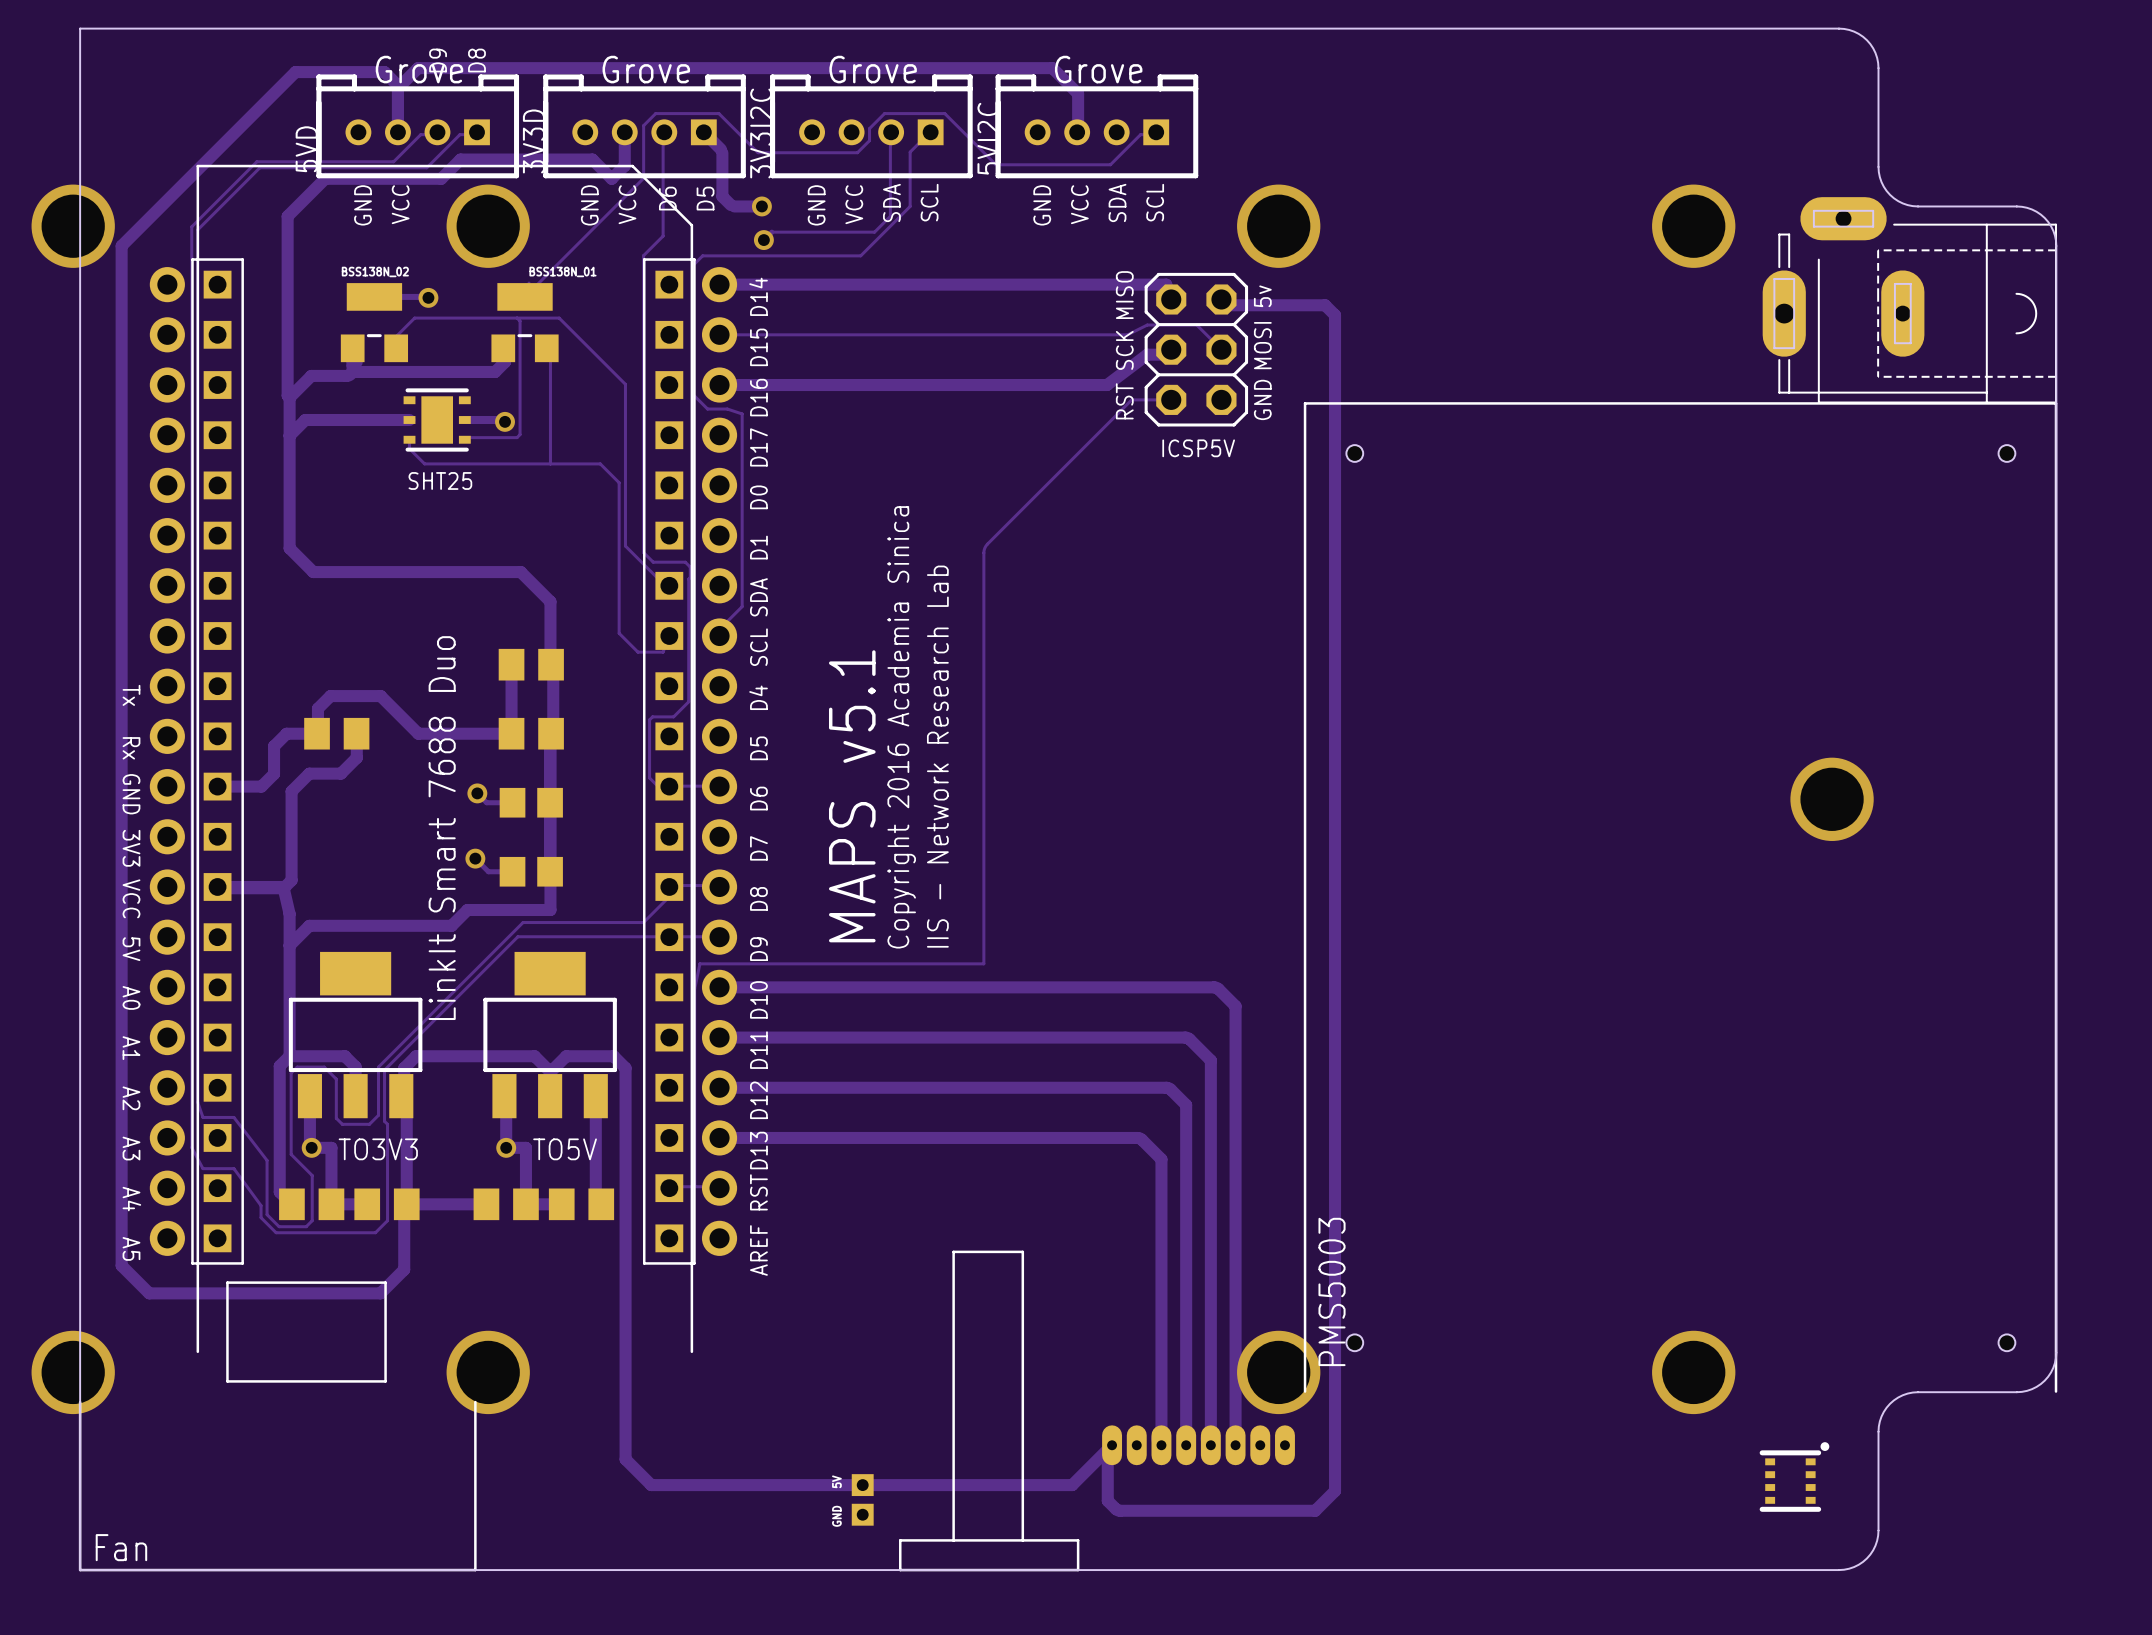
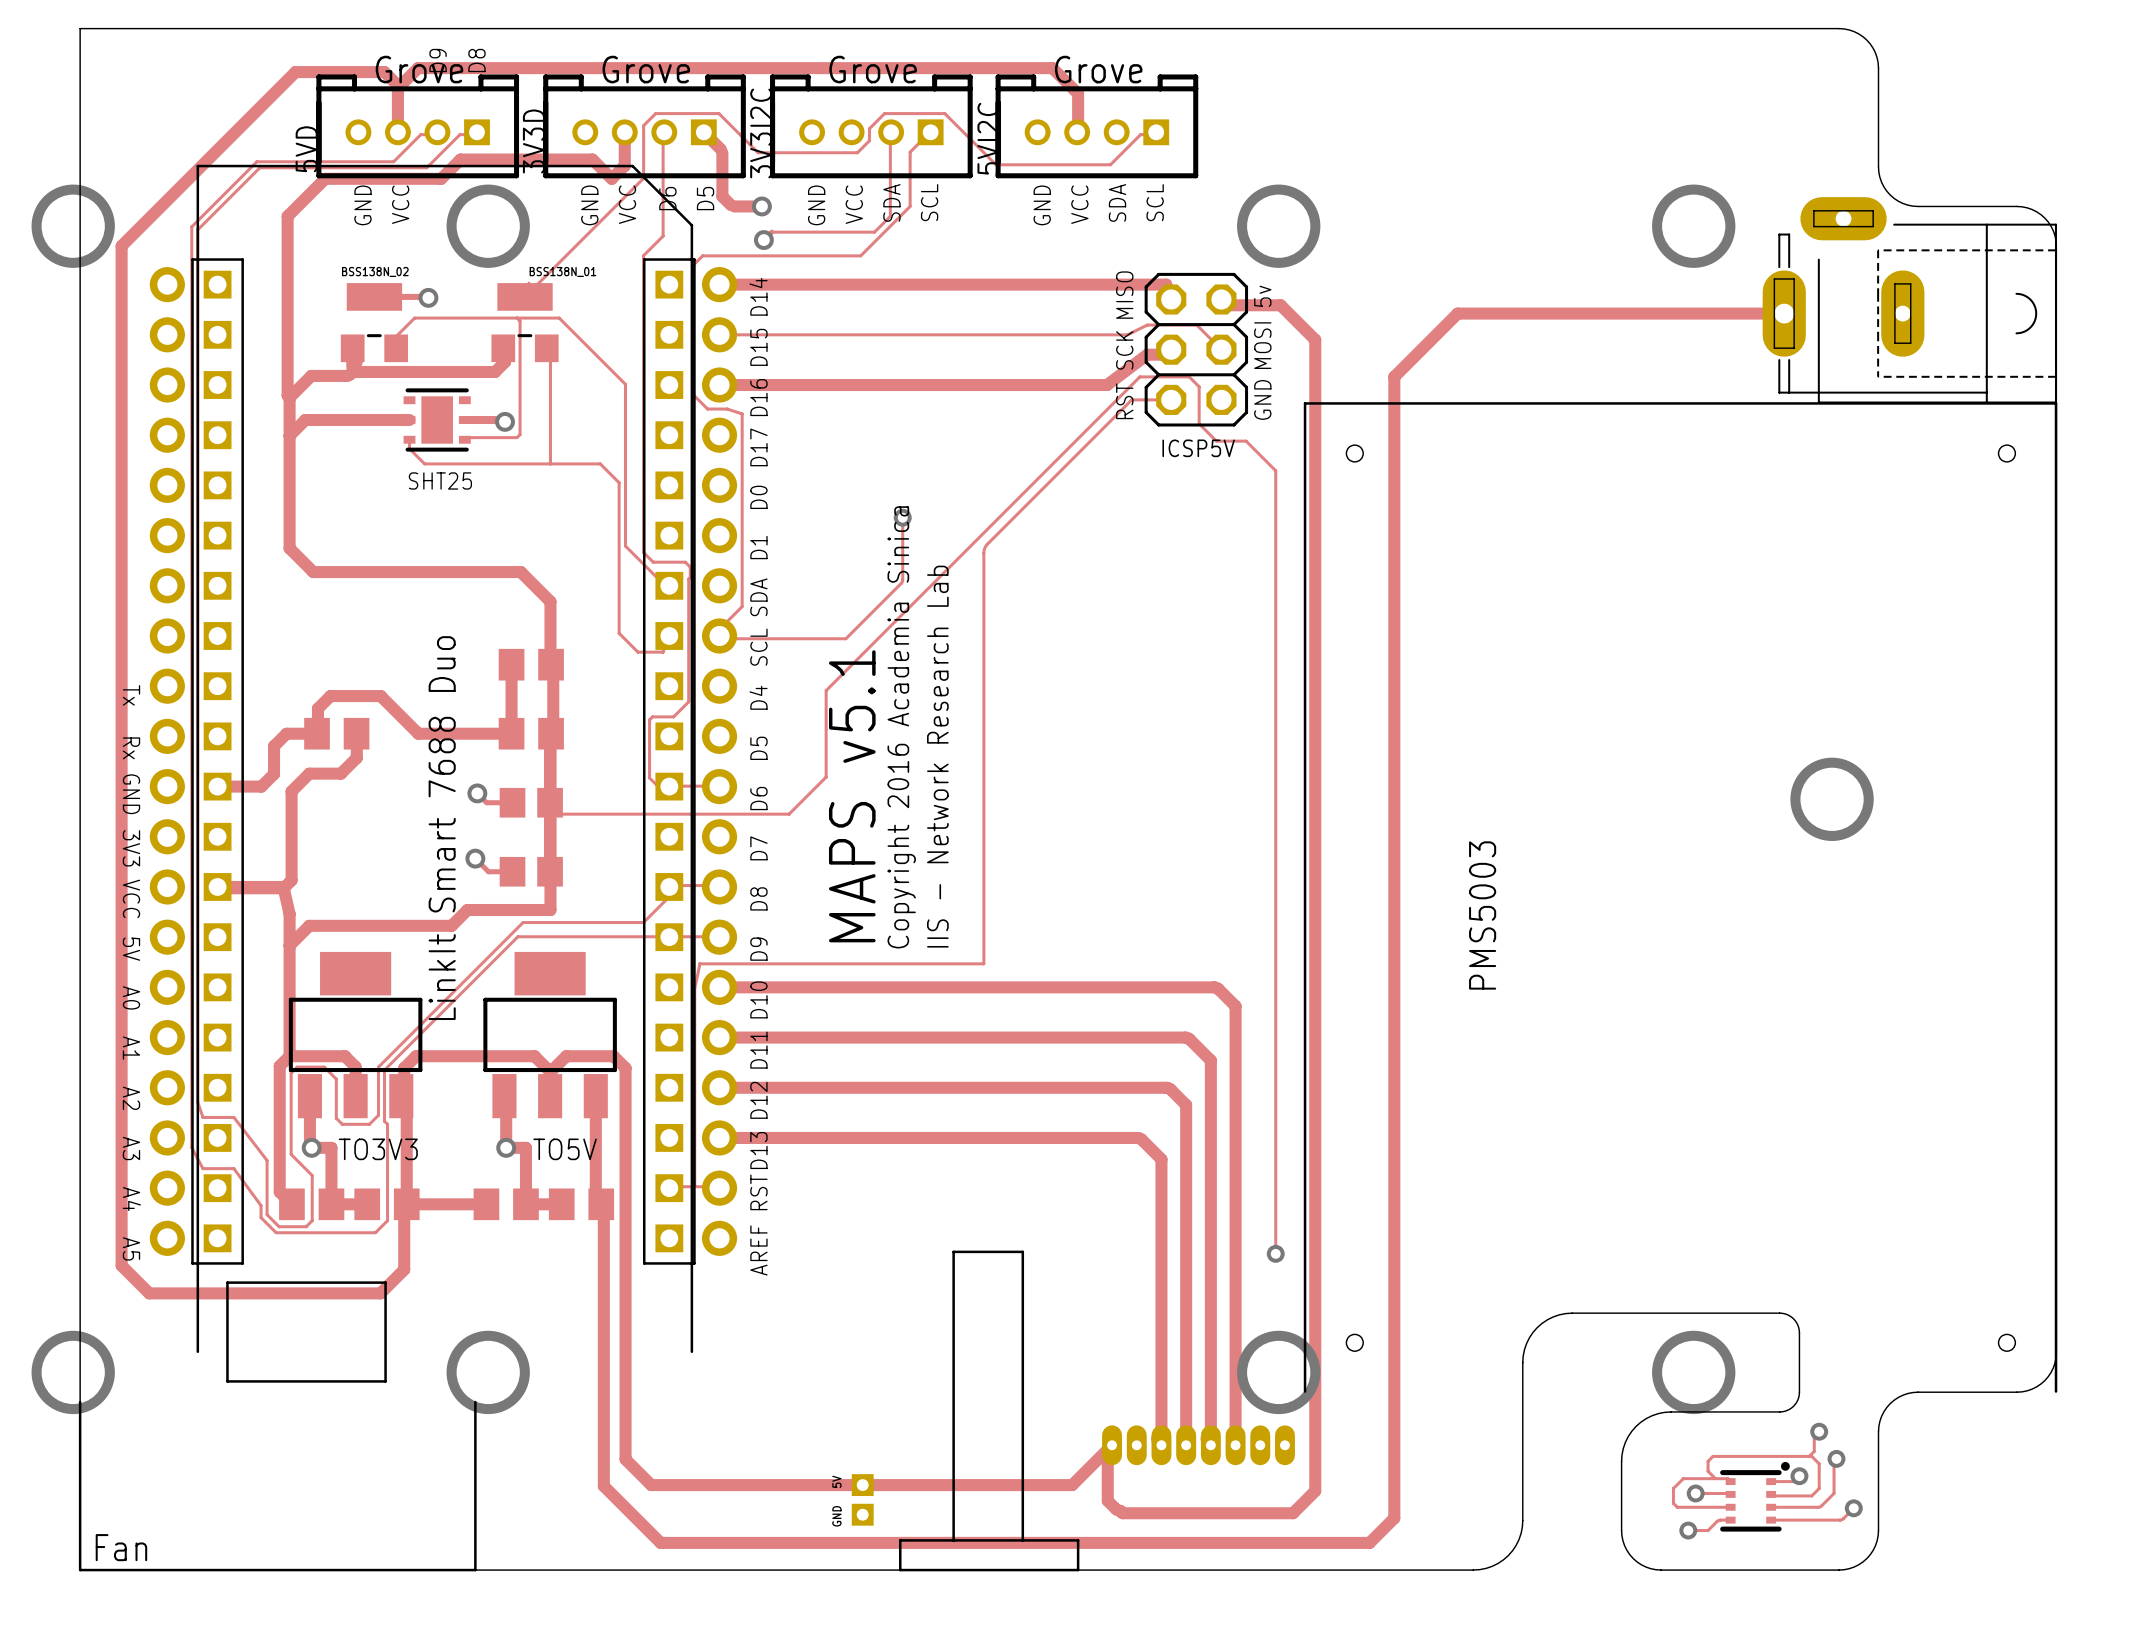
track: (1280, 305) (1325, 305) (1335, 315) (1335, 1491) (1315, 1510) (1120, 1510) -> (1280, 305) (1315, 339) (1315, 1491) (1293, 1513) (1122, 1513) (1120, 1510)
track: none -> (1784, 313) (1457, 313) (1394, 376) (1394, 1518) (1369, 1542) (660, 1542) (603, 1486) (603, 1206) (601, 1204)
drawing shape: [1303, 402, 2058, 1393] -> [1303, 402, 2058, 1393]
track: none -> (902, 517) (902, 581) (845, 638) (724, 638) (719, 636)
via: none -> (902, 517)
track: none -> (550, 802) (561, 814) (789, 814) (826, 777) (826, 690) (1139, 376) (1189, 376) (1199, 386) (1199, 423) (1216, 441) (1246, 441) (1275, 470) (1275, 1253)
via: none -> (1275, 1253)
track: none -> (1819, 1431) (1814, 1437) (1814, 1451) (1809, 1456)
via: none -> (1819, 1431)
track: none -> (1836, 1458) (1834, 1462) (1834, 1493) (1821, 1506) (1771, 1507)
via: none -> (1836, 1458)
track: none -> (1799, 1476) (1794, 1481) (1771, 1481)
via: none -> (1799, 1476)
part position: (1794, 1477) -> (1754, 1496)
track: none -> (1715, 1478) (1708, 1471) (1708, 1461) (1712, 1456) (1811, 1456) (1819, 1463) (1819, 1488) (1811, 1495) (1771, 1494)
track: none -> (1727, 1478) (1730, 1481) (1727, 1478) (1683, 1478) (1673, 1488) (1673, 1503) (1677, 1507) (1730, 1507)
track: none -> (1695, 1493) (1730, 1494)
via: none -> (1695, 1493)
track: none -> (1853, 1508) (1840, 1520) (1771, 1520)
via: none -> (1853, 1508)
track: none -> (1730, 1520) (1718, 1520) (1708, 1530) (1688, 1530)
via: none -> (1688, 1530)
board edge: (1473, 1570) (1661, 1570) -> (1473, 1570) (1492, 1566) (1503, 1559) (1516, 1545) (1521, 1533) (1522, 1520) (1523, 1356) (1529, 1337) (1542, 1323) (1553, 1316) (1572, 1313) (1779, 1313) (1789, 1315) (1796, 1323) (1799, 1332) (1799, 1394) (1796, 1402) (1791, 1407) (1779, 1411) (1664, 1412) (1646, 1418) (1636, 1426) (1628, 1436) (1623, 1448) (1621, 1461) (1622, 1540) (1626, 1550) (1637, 1561) (1645, 1567) (1661, 1570)

